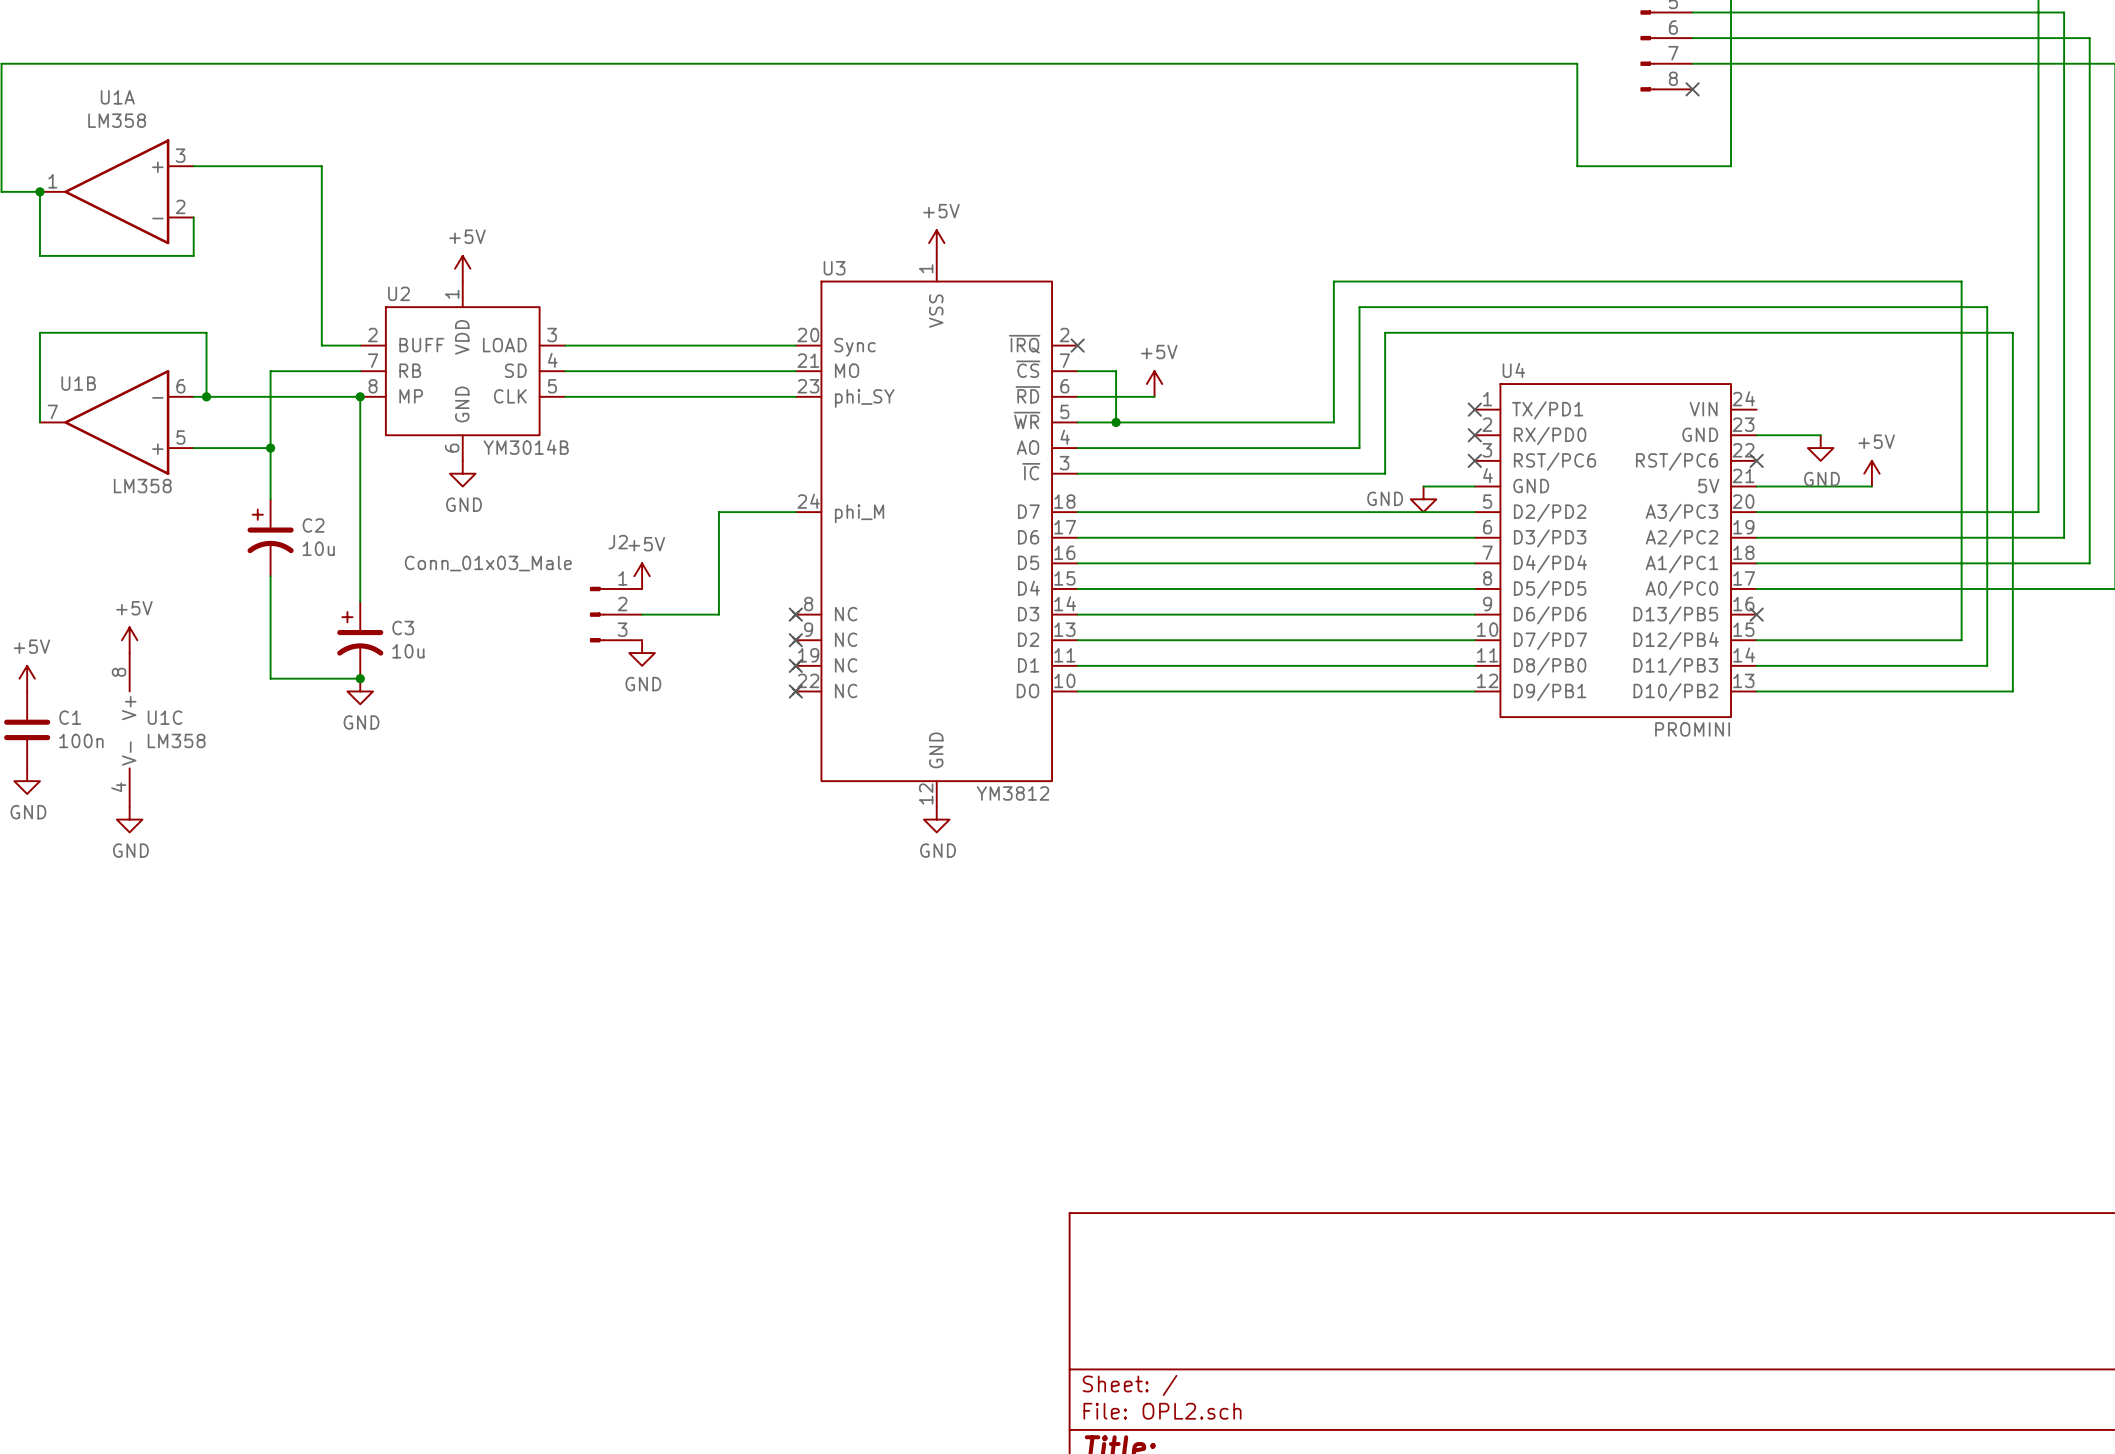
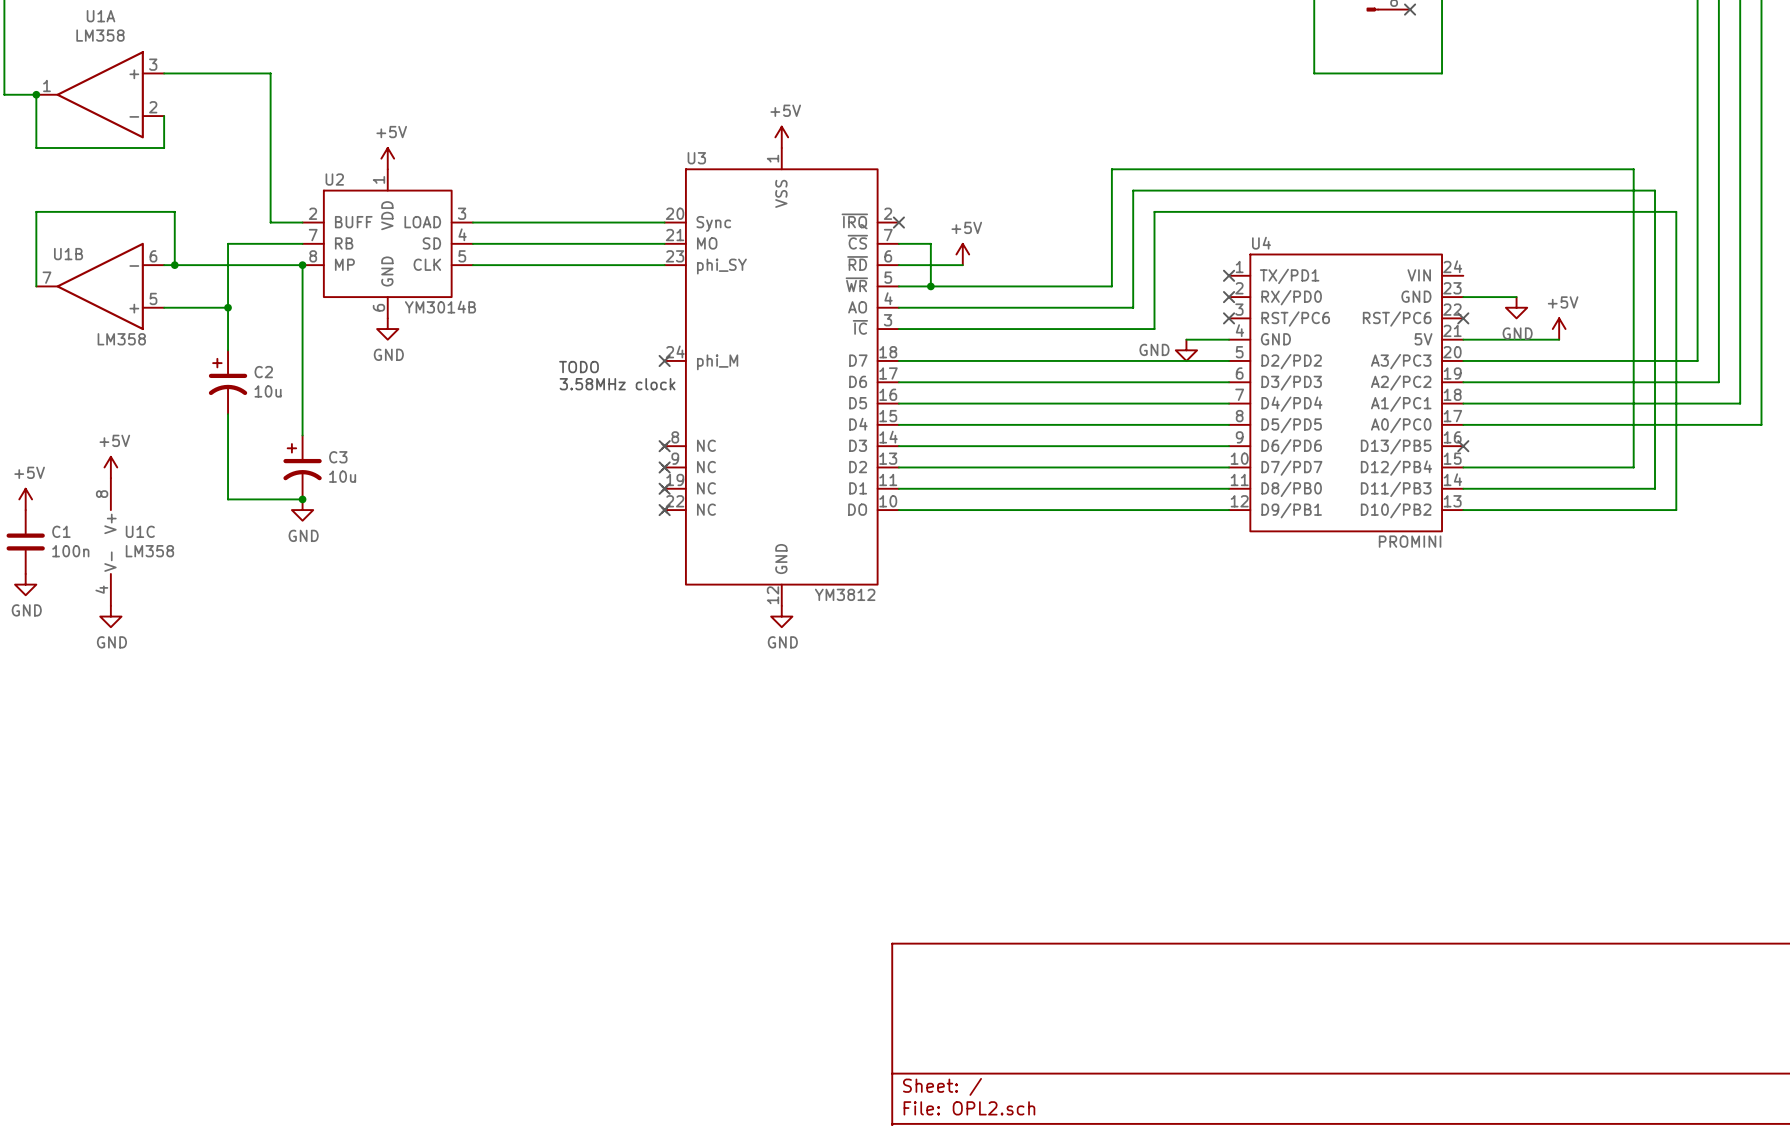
wire: (795, 512) (718, 512) (718, 614) (642, 614) -> none
no-connect mark: none -> (664, 360)
text: none -> TODO (579, 367)
text: none -> 3.58MHz clock (617, 384)
power symbol: +5V (642, 576) -> none
J2: Conn_01x03_Male (616, 614) -> none
power symbol: GND (642, 653) -> none

